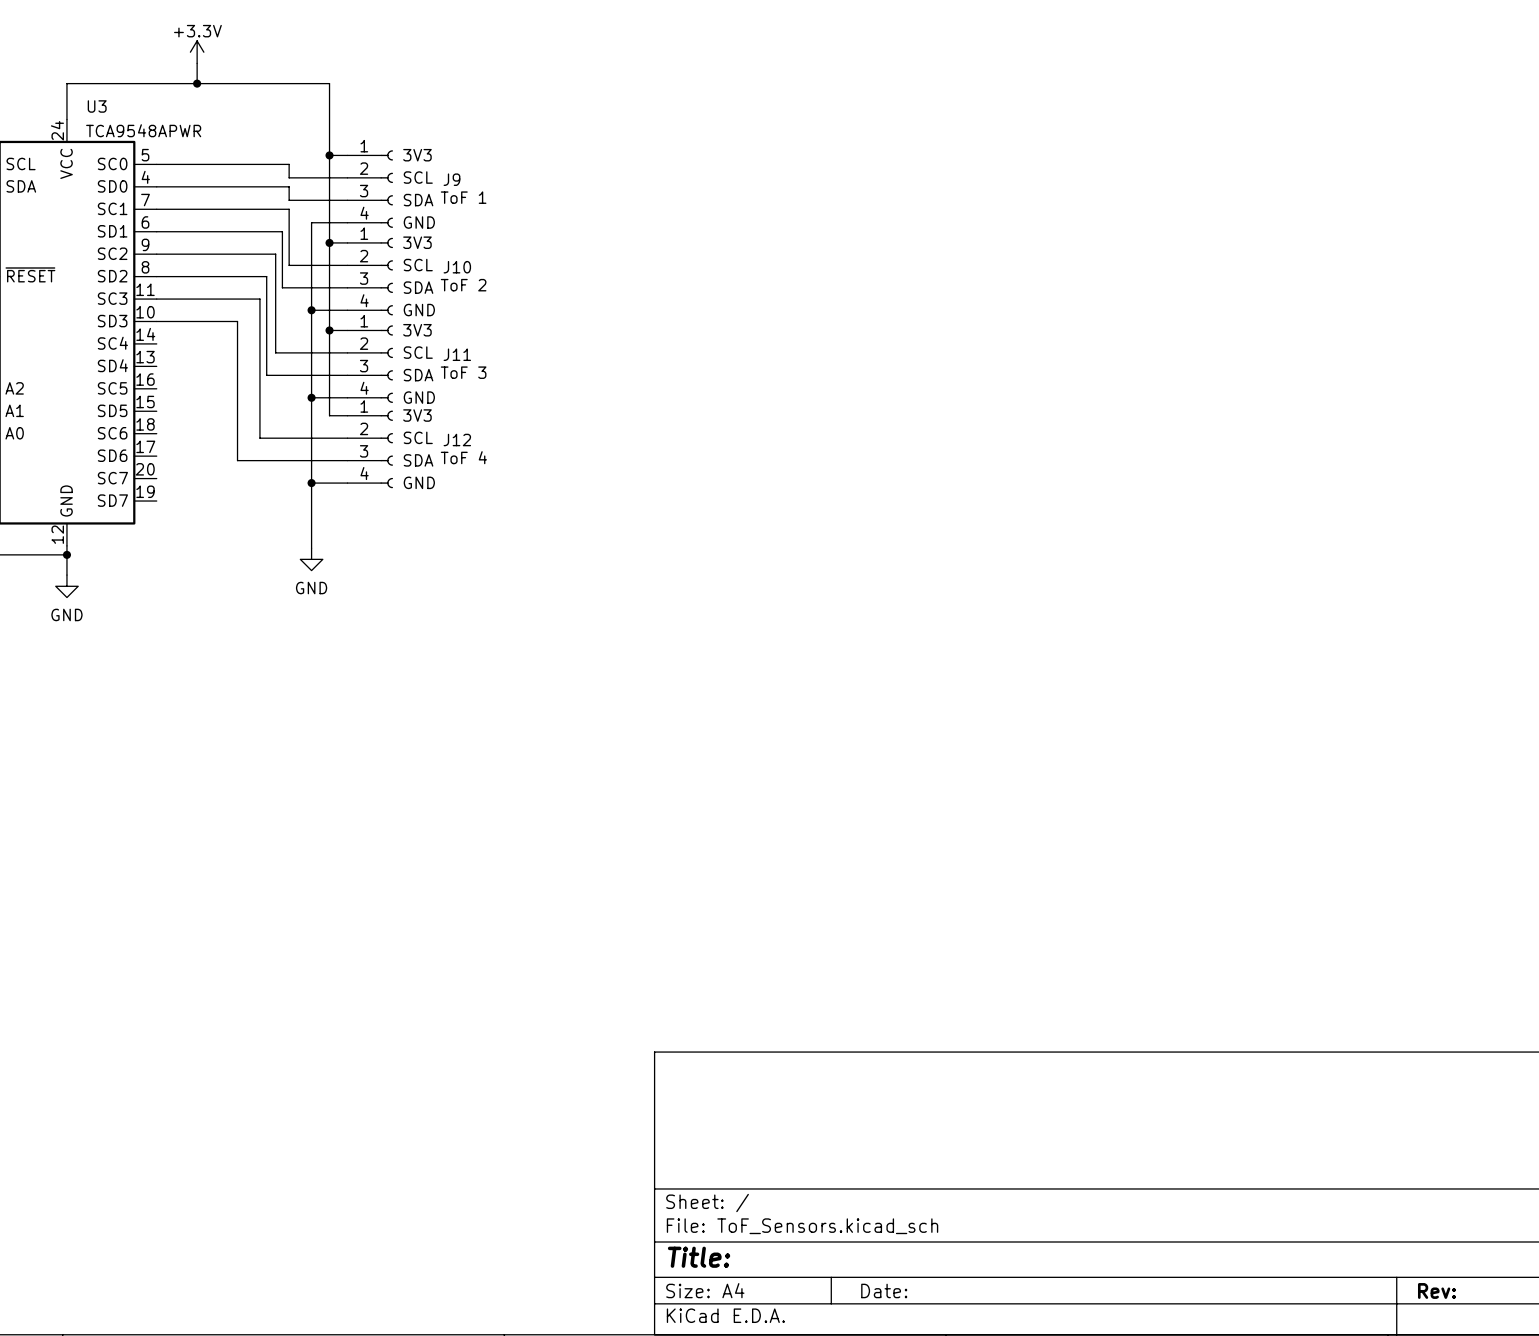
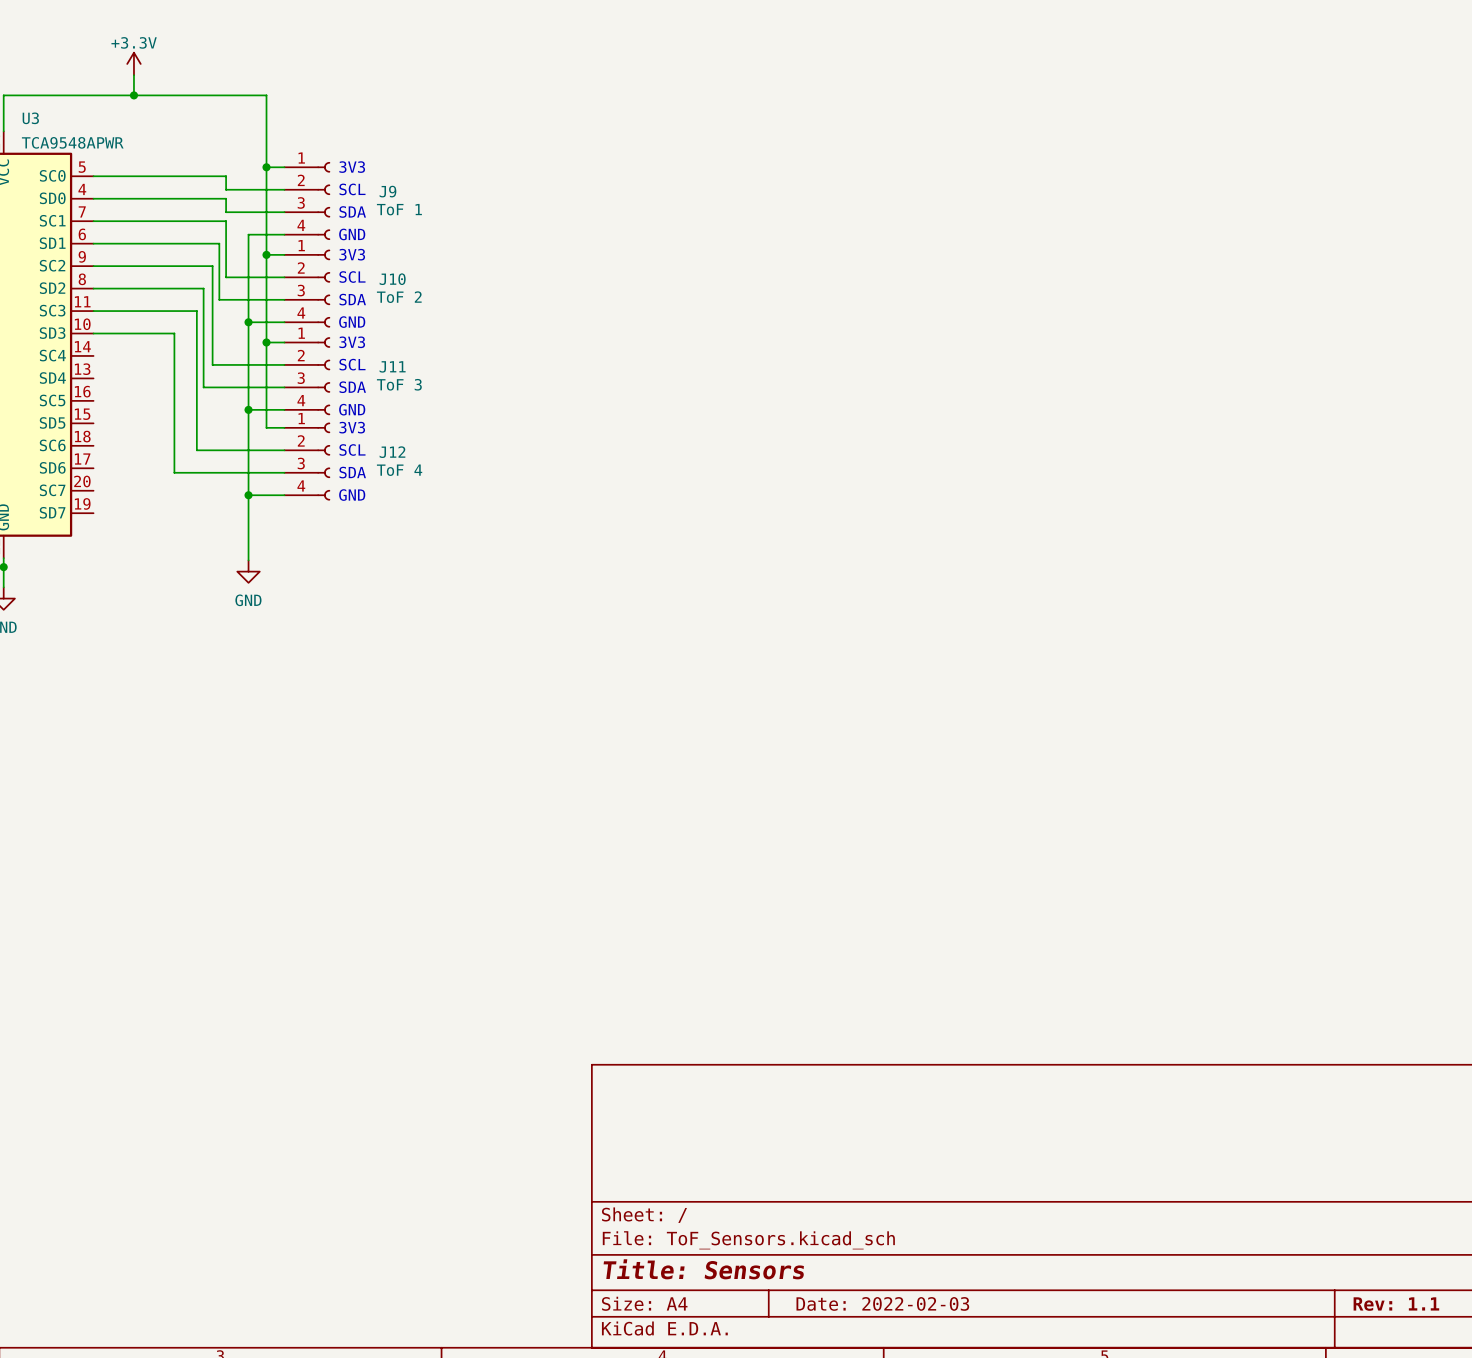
title block: Title: (699, 1257) -> Title: Sensors (703, 1269)
title block: Date: (884, 1290) -> Date: 2022-02-03 (882, 1303)
title block: Rev: (1436, 1290) -> Rev: 1.1 (1396, 1304)

